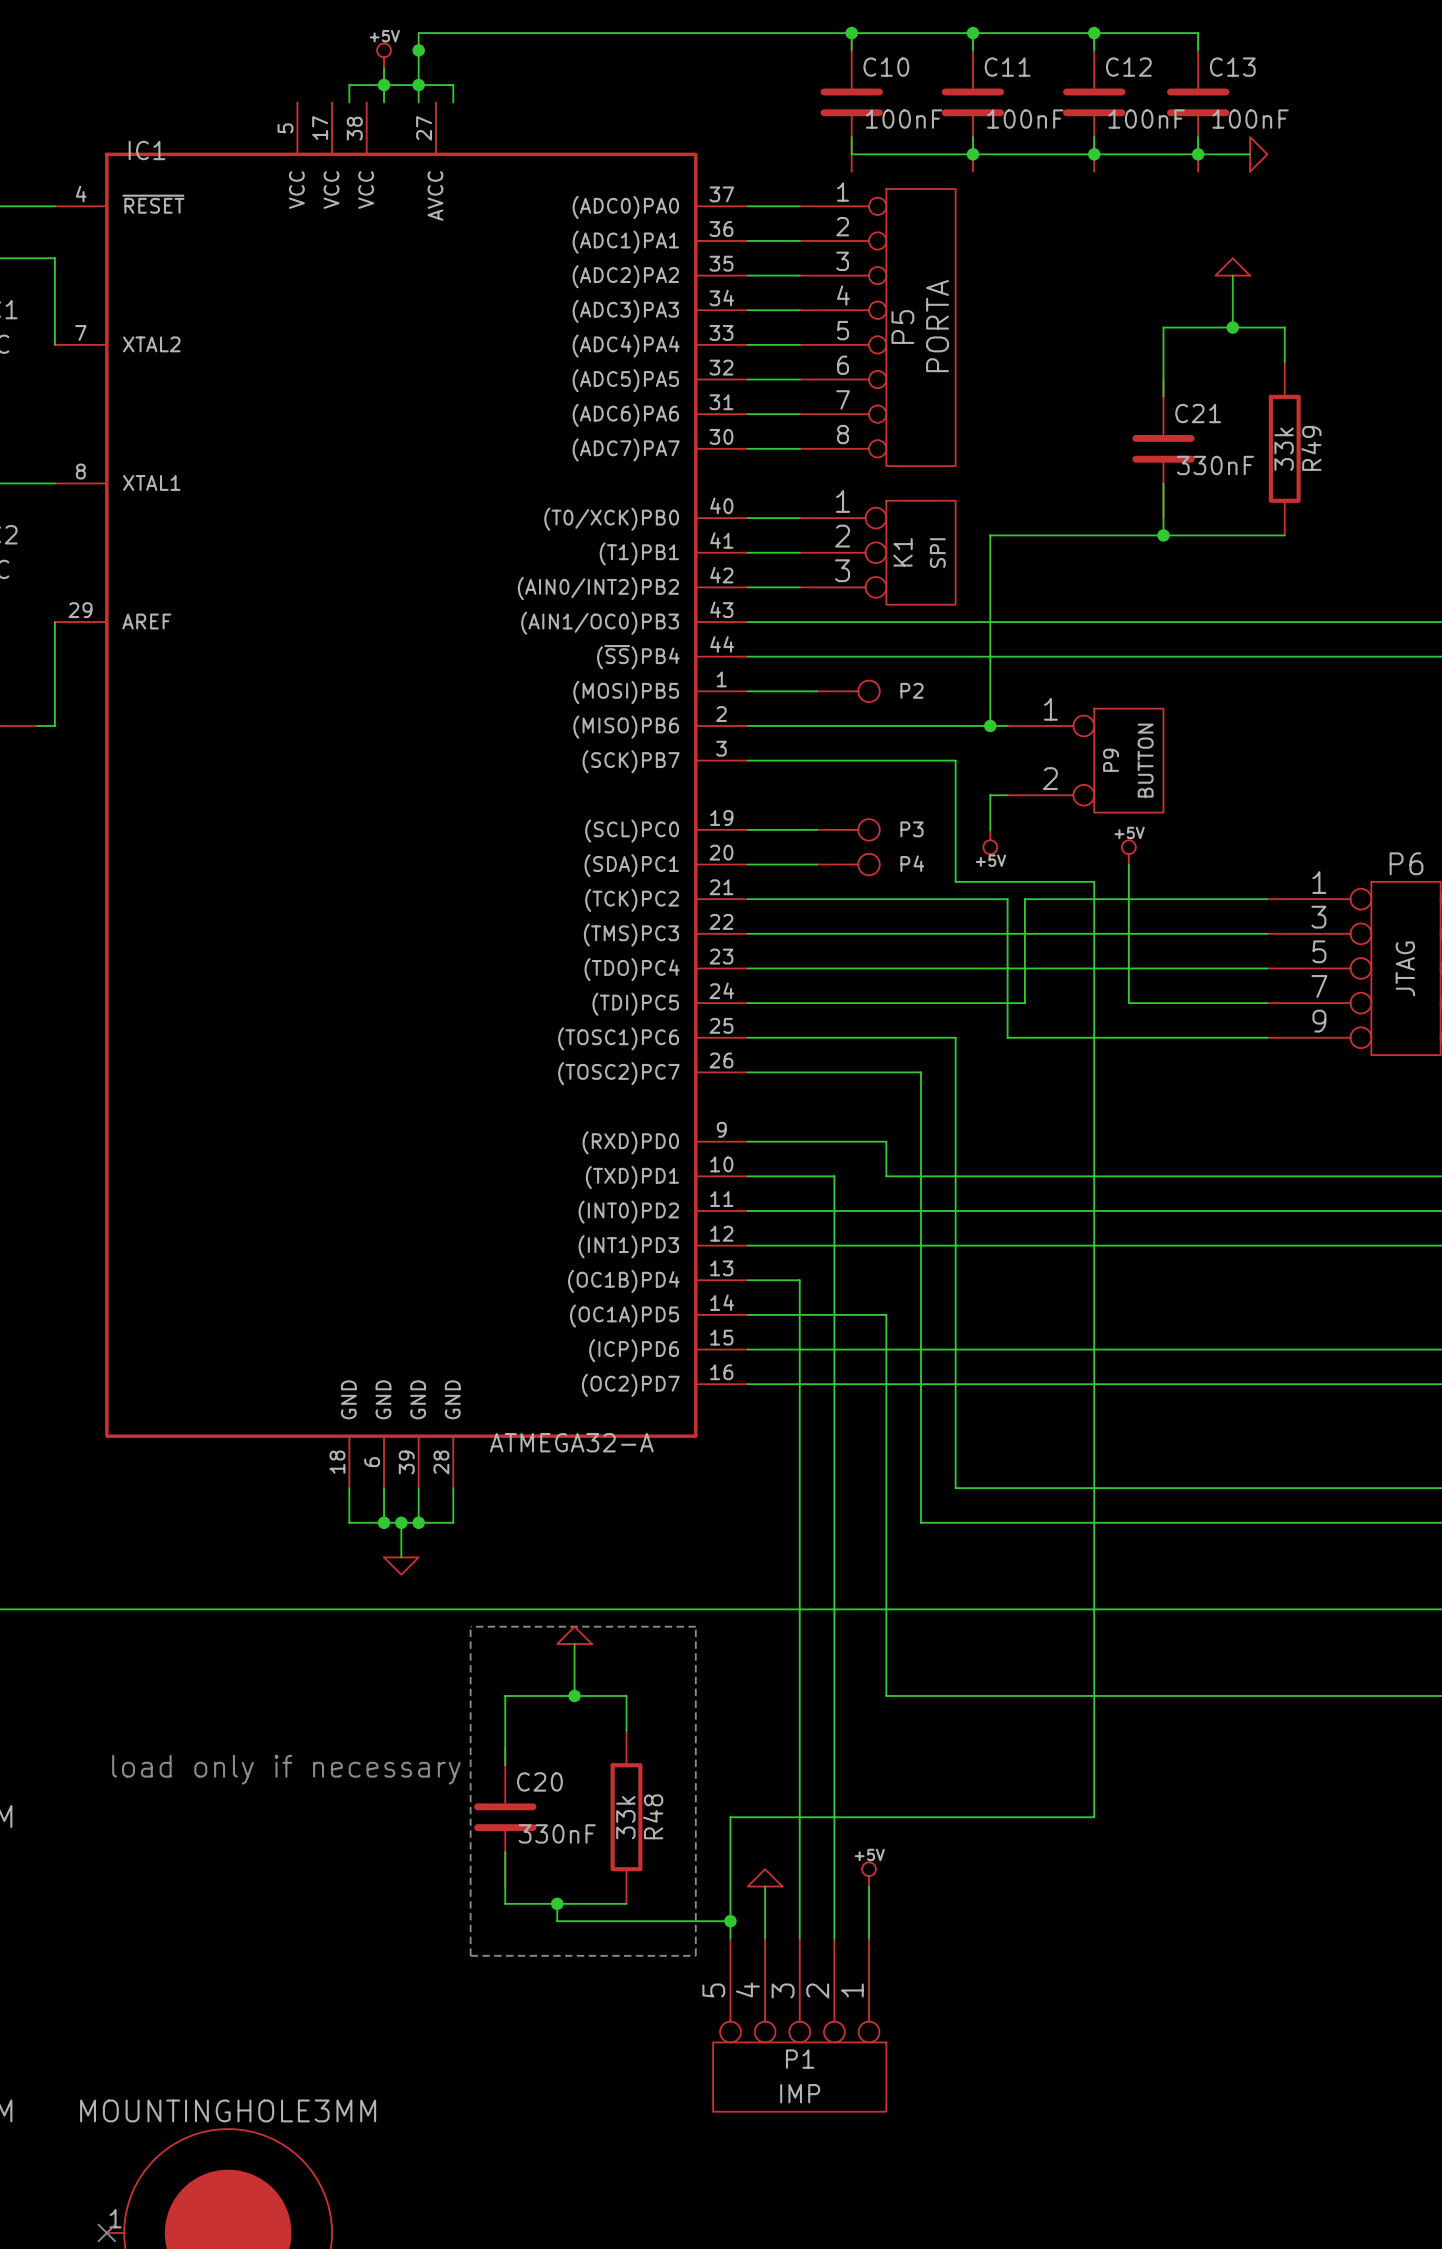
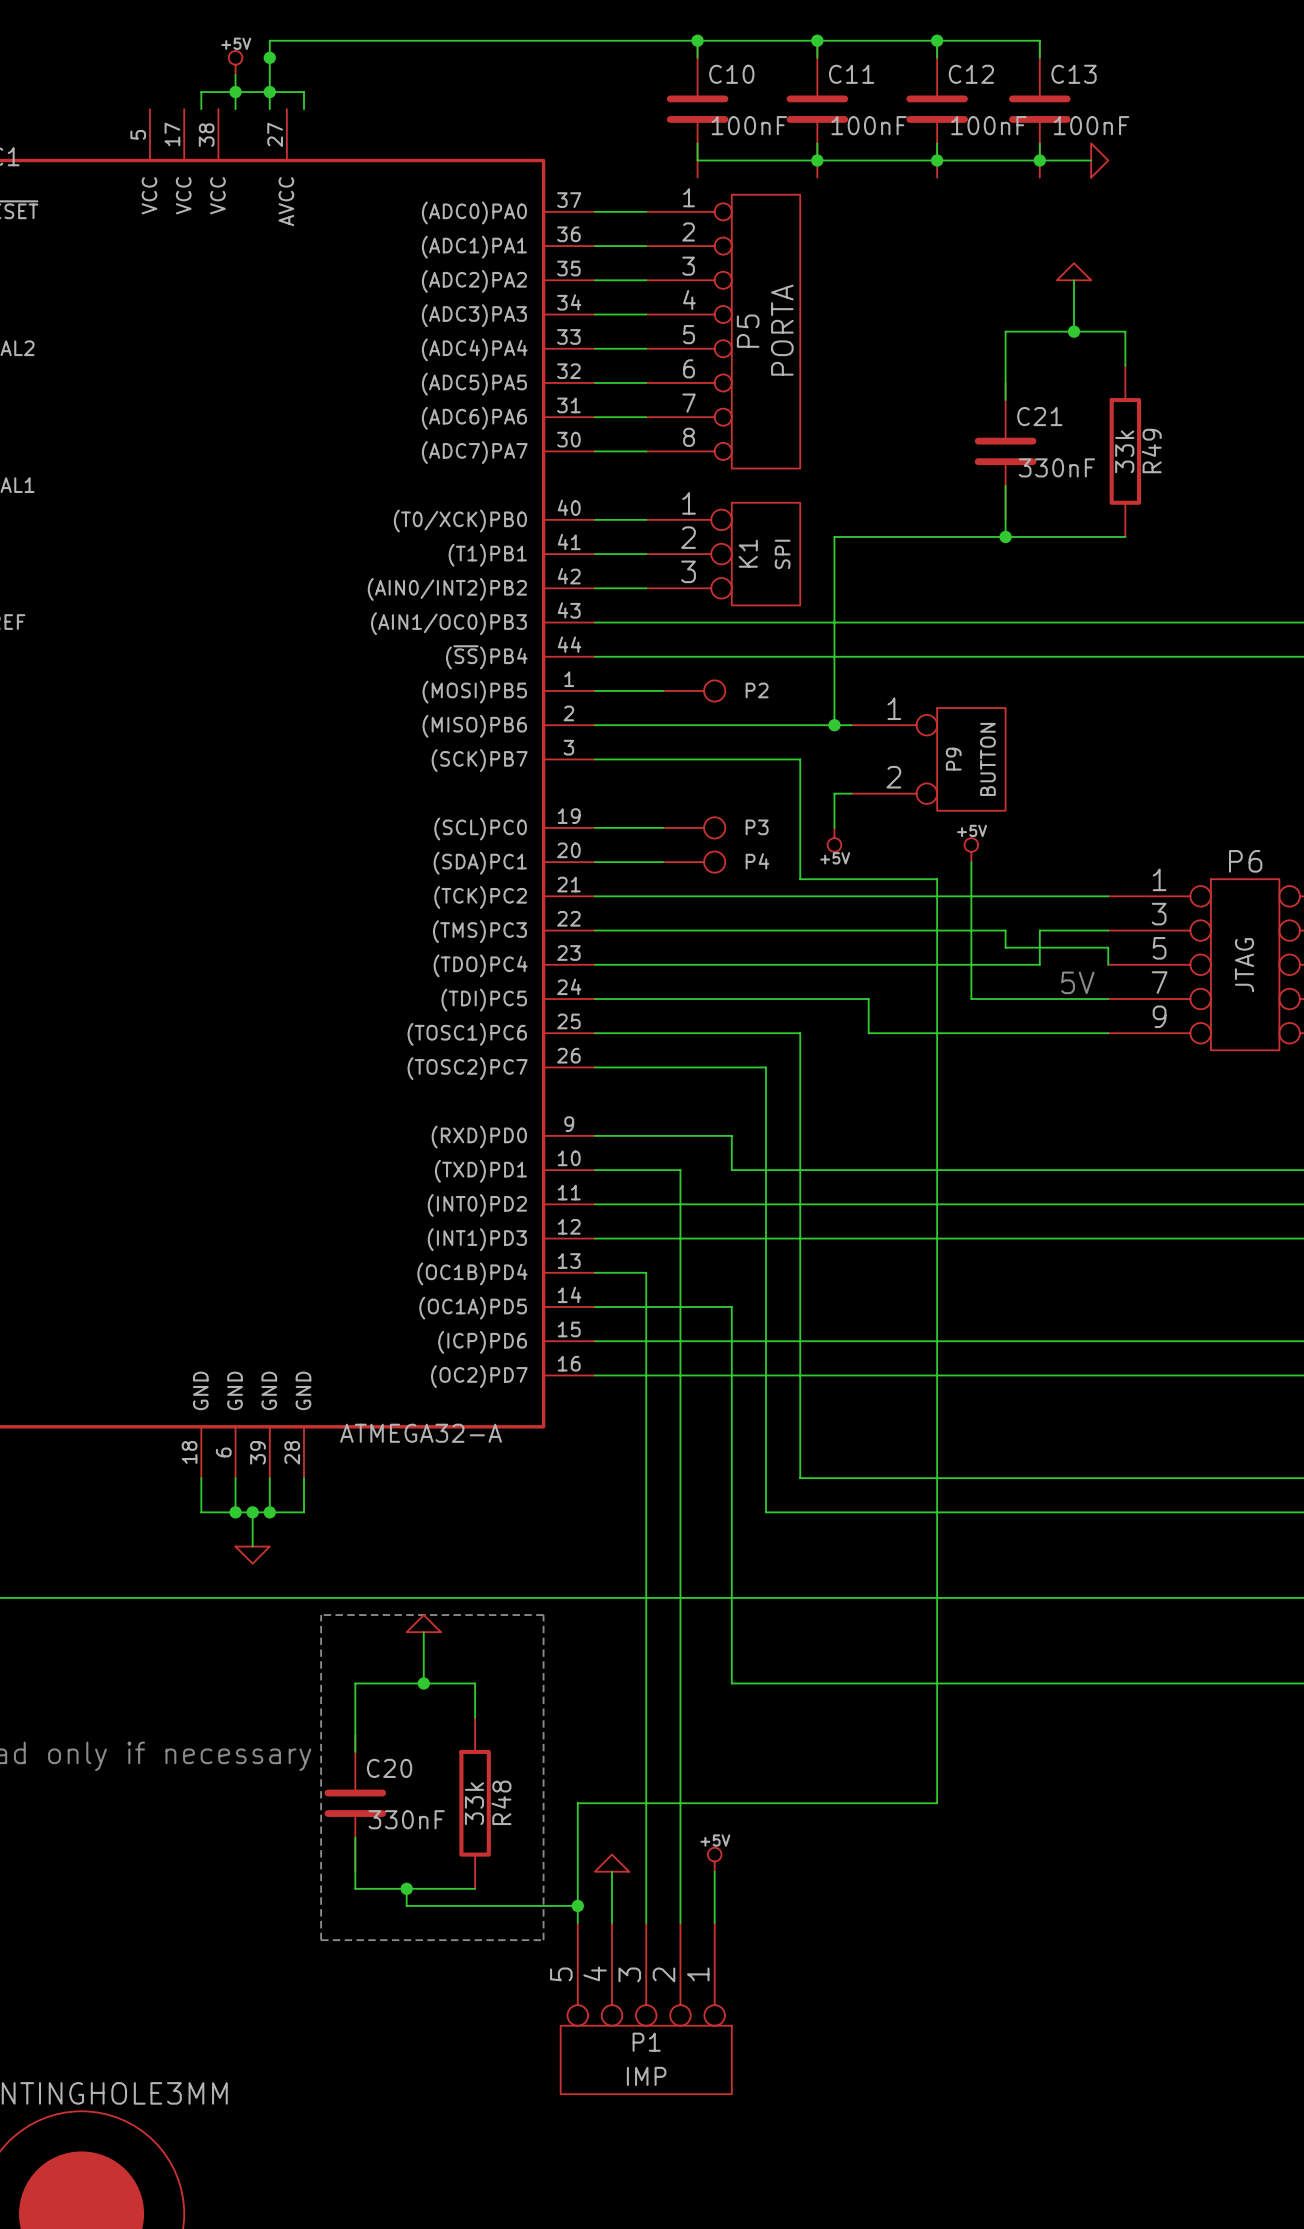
wire: (1007, 899) (1007, 1037) (1024, 1037) -> (868, 999) (868, 1033)
wire: (1024, 899) (1024, 1003) -> (868, 896) (851, 896)
wire: (1163, 933) (1198, 933) -> (1039, 964) (1039, 930)
wire: (1198, 968) (1267, 968) -> (1005, 930) (1005, 947) (1108, 947) (1108, 964)
text: none -> 5V (1077, 982)

